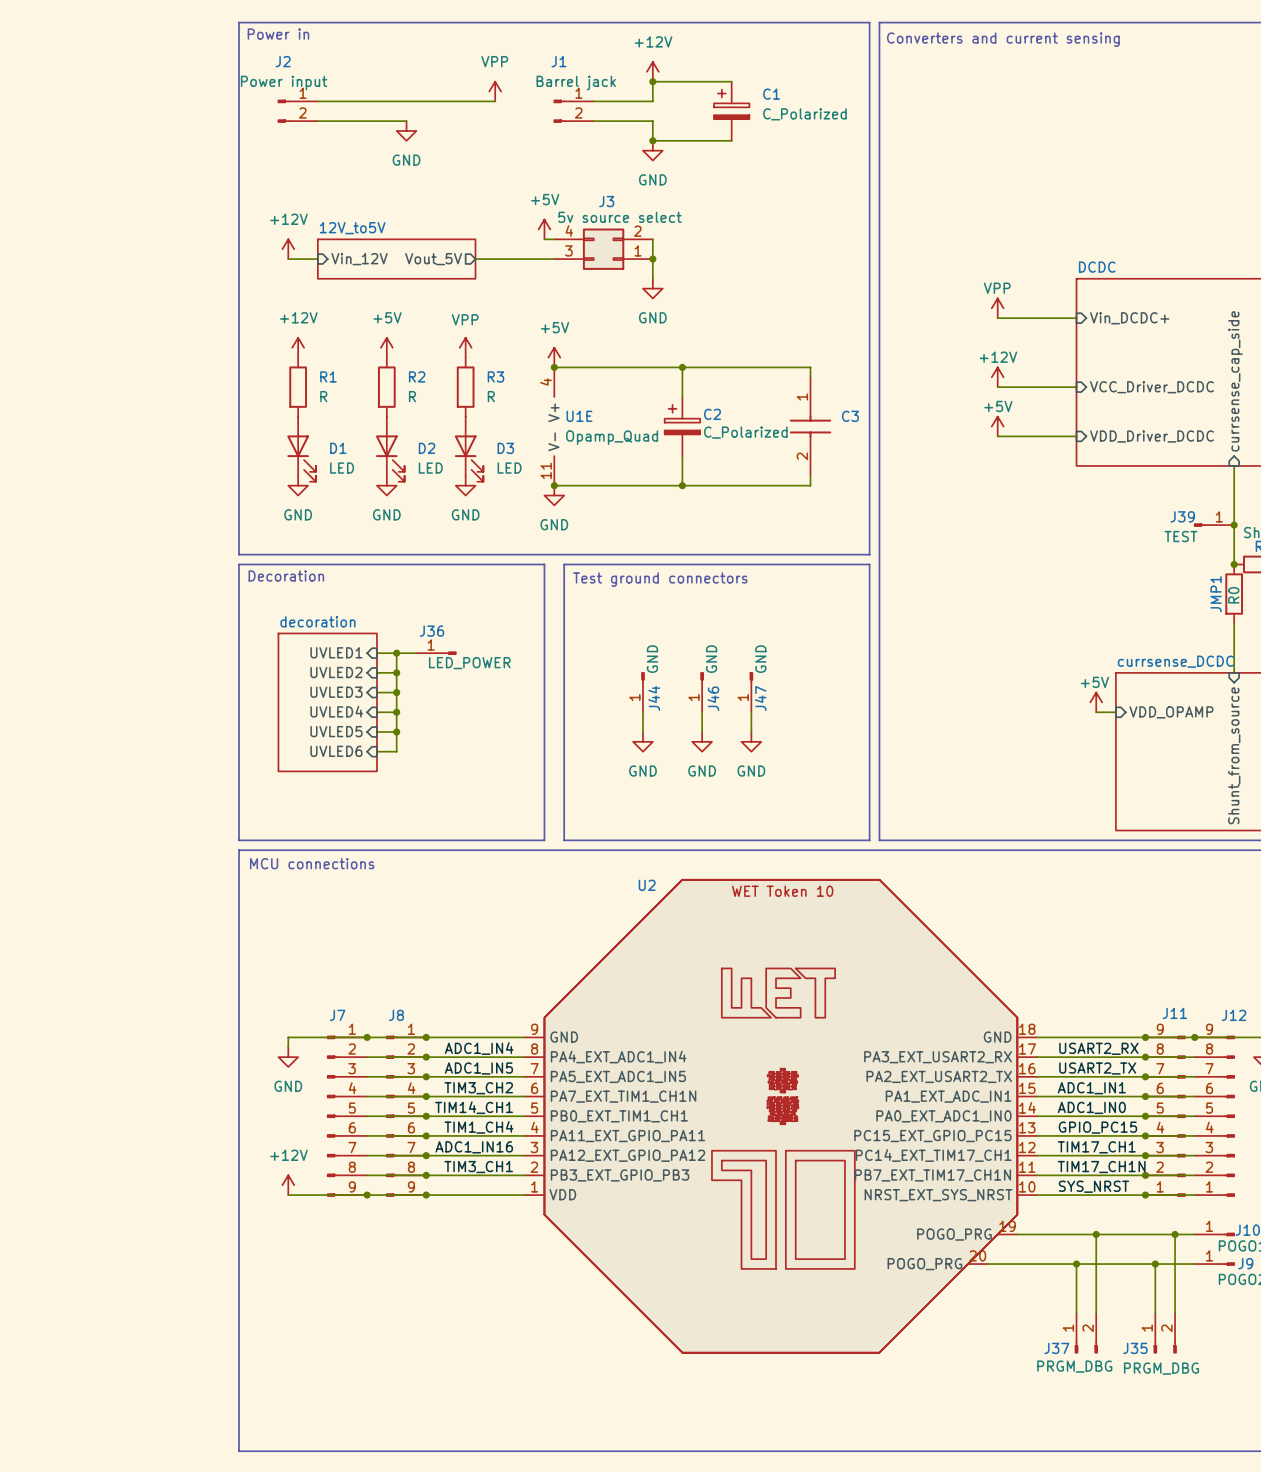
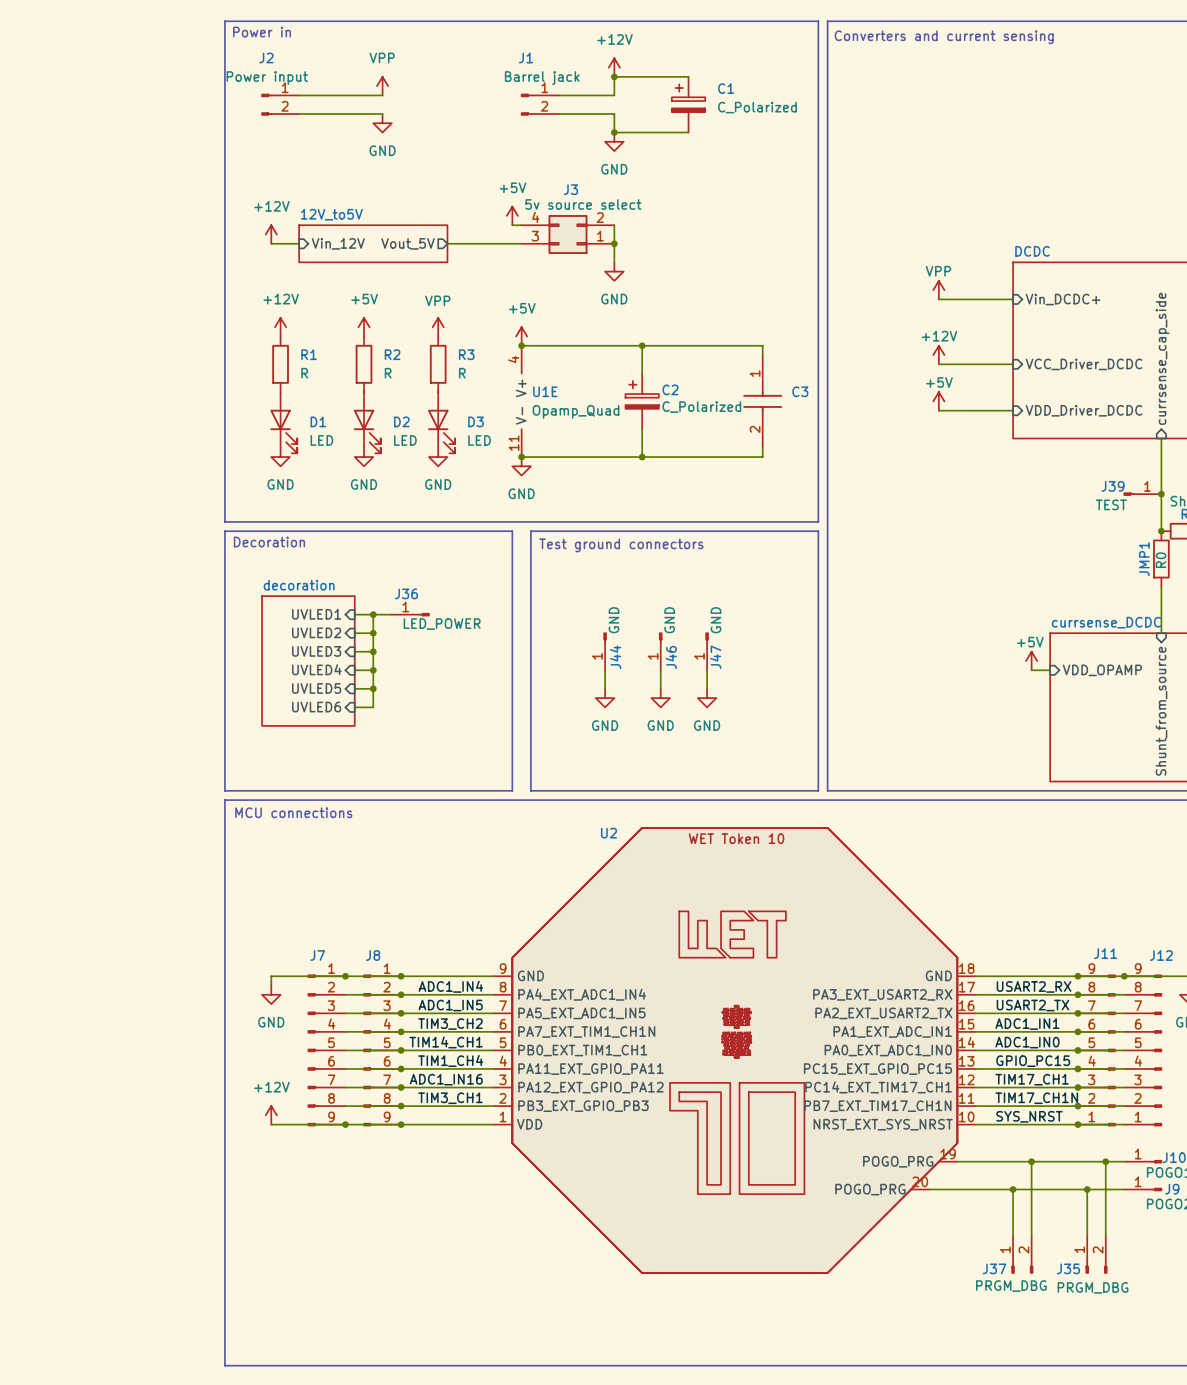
power symbol position: VPP (495, 91) -> VPP (382, 86)
wire: (406, 101) (495, 101) -> none

